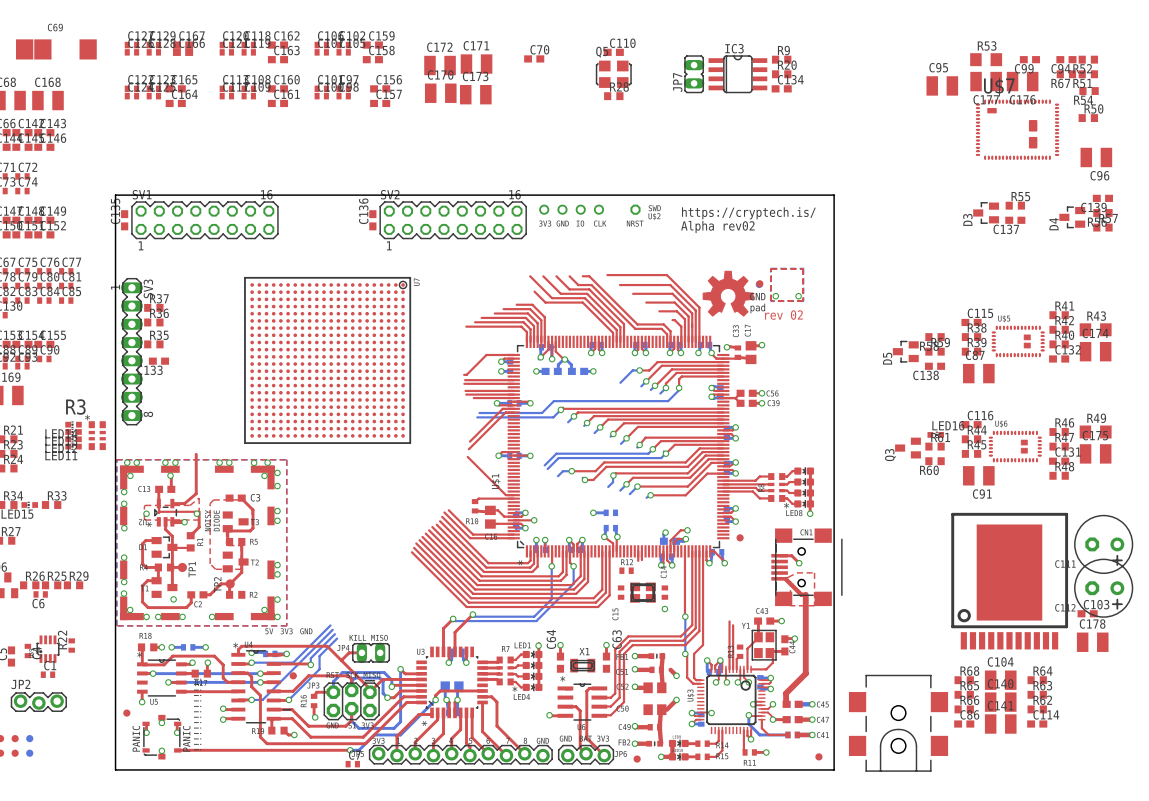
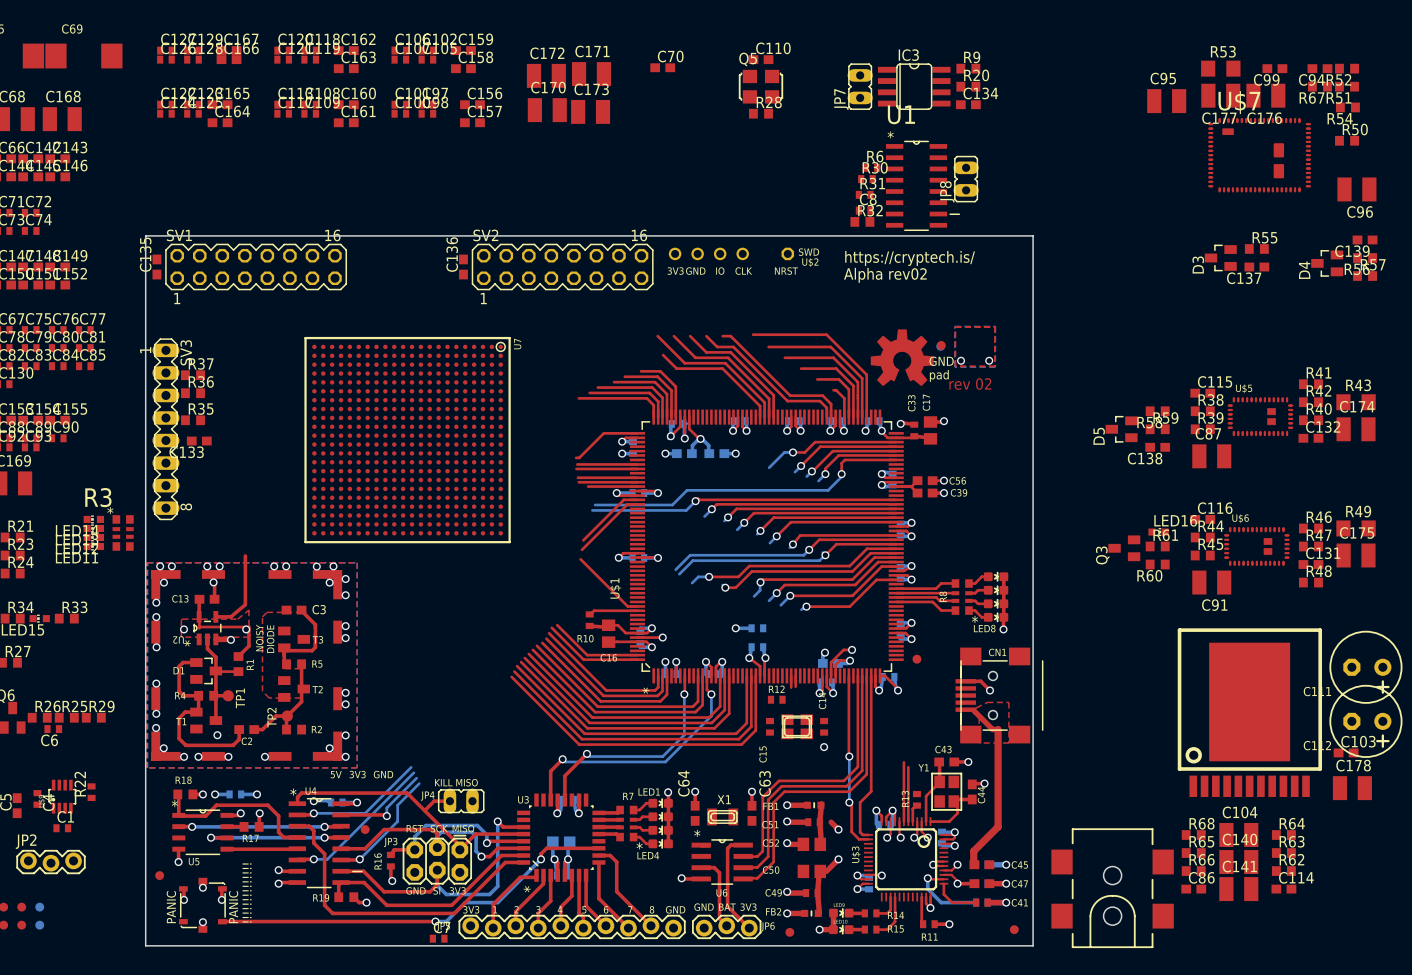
R6: none -> (871, 167)
R30: none -> (866, 179)
JP8: none -> (966, 179)
U1: none -> (922, 185)
R31: none -> (864, 194)
C8: none -> (864, 210)
R32: none -> (862, 221)

